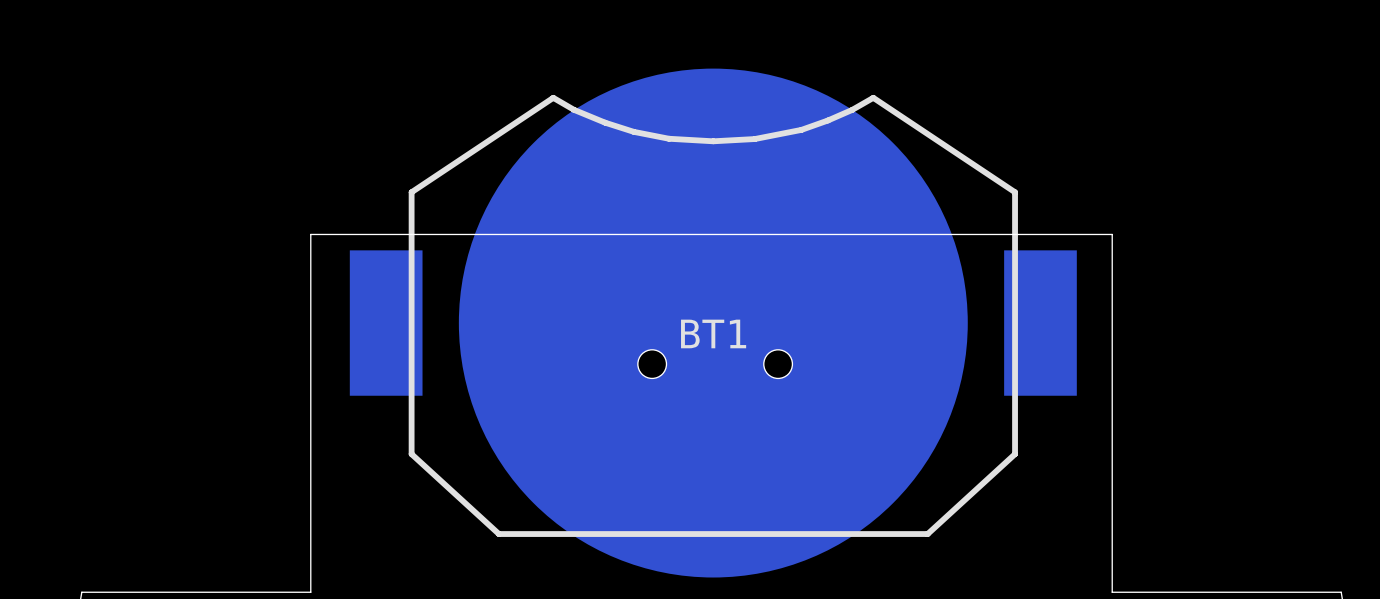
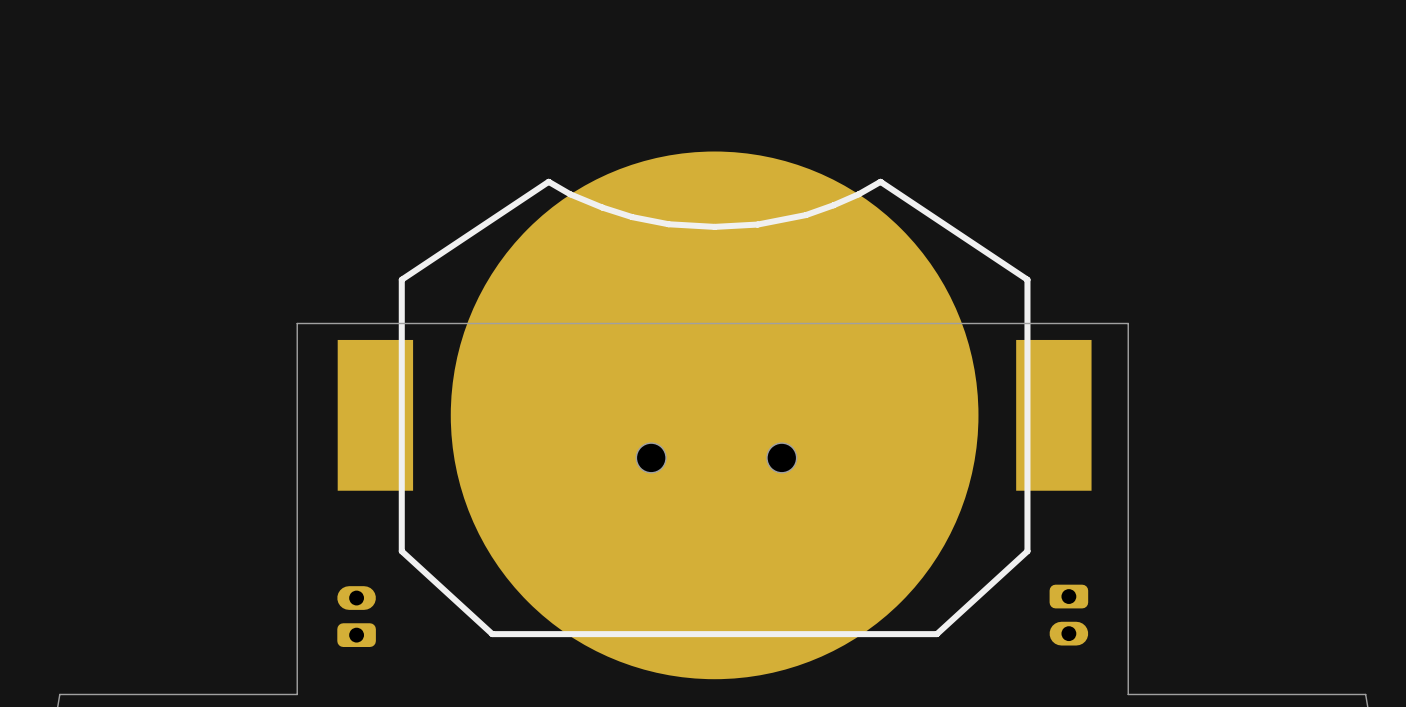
BT1 name: BT1 (713, 333) -> none
part: none -> (1068, 615)
part: none -> (356, 616)

